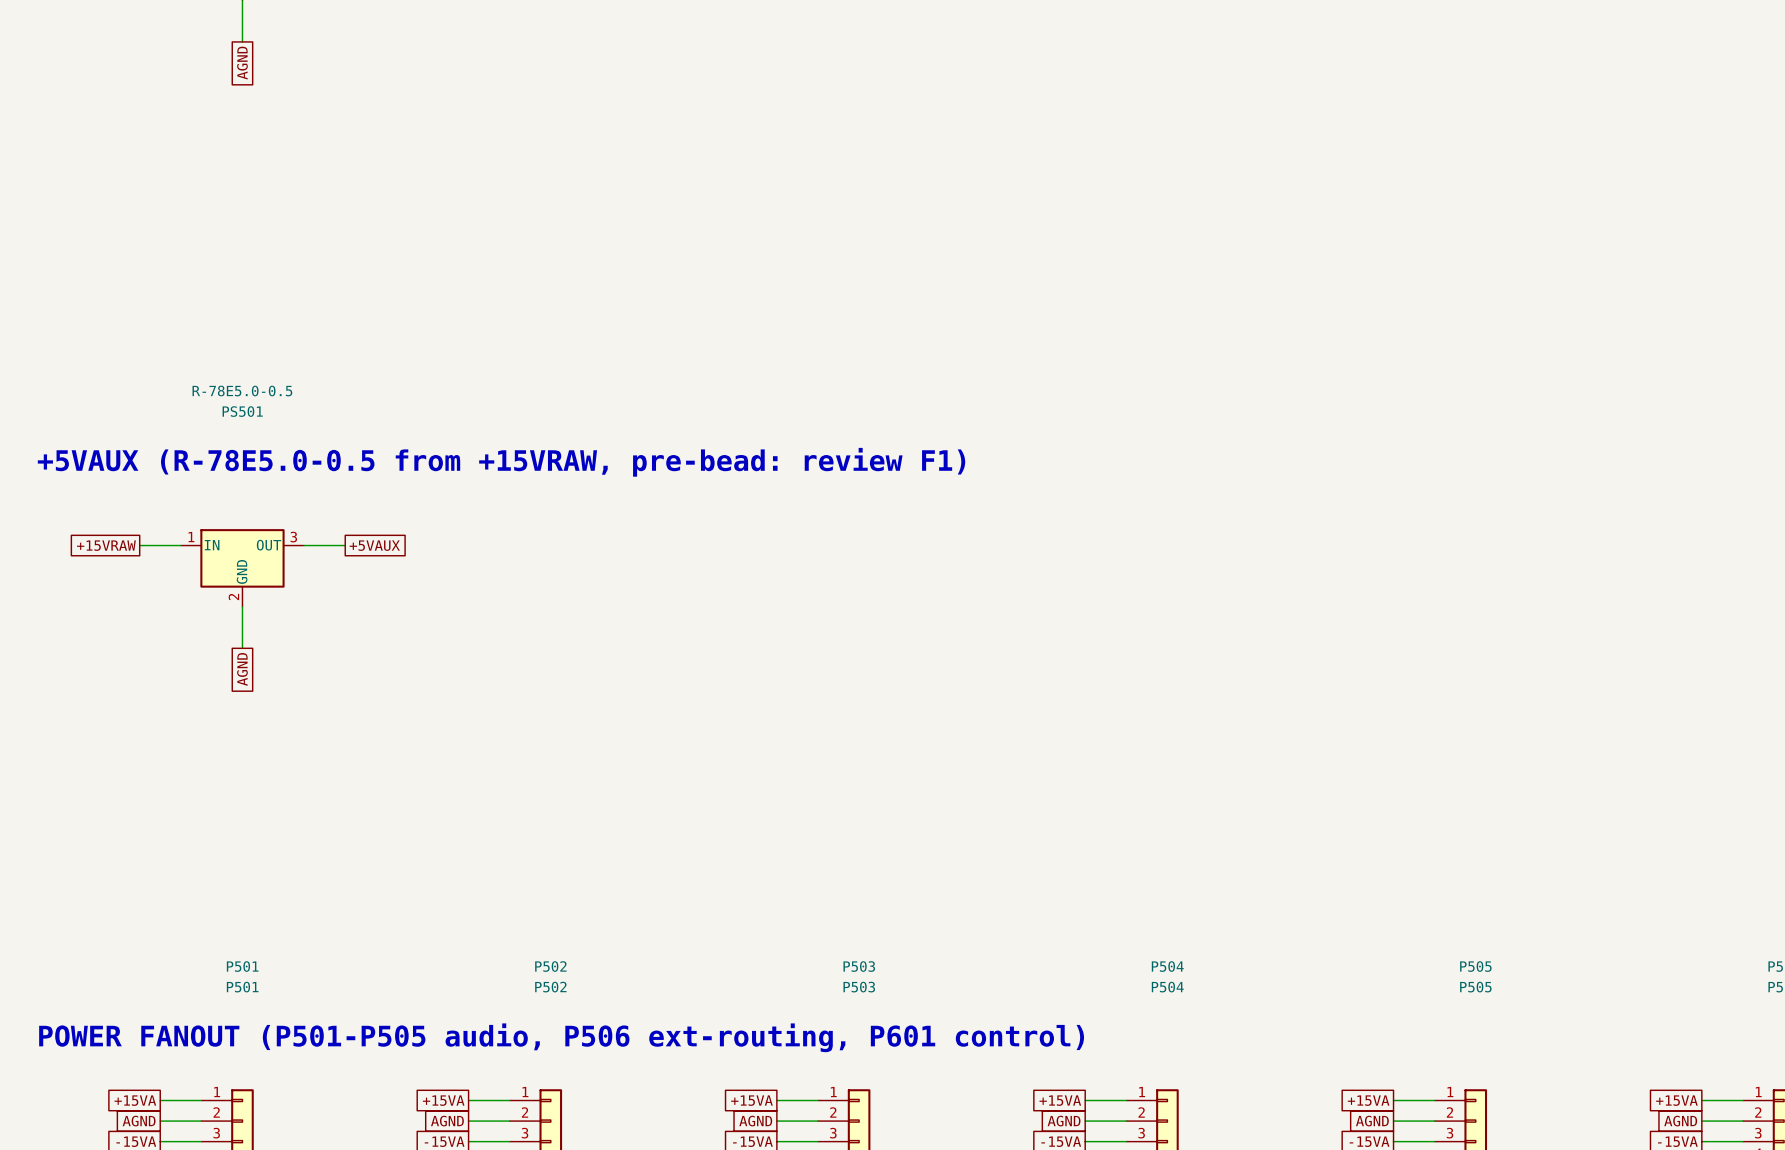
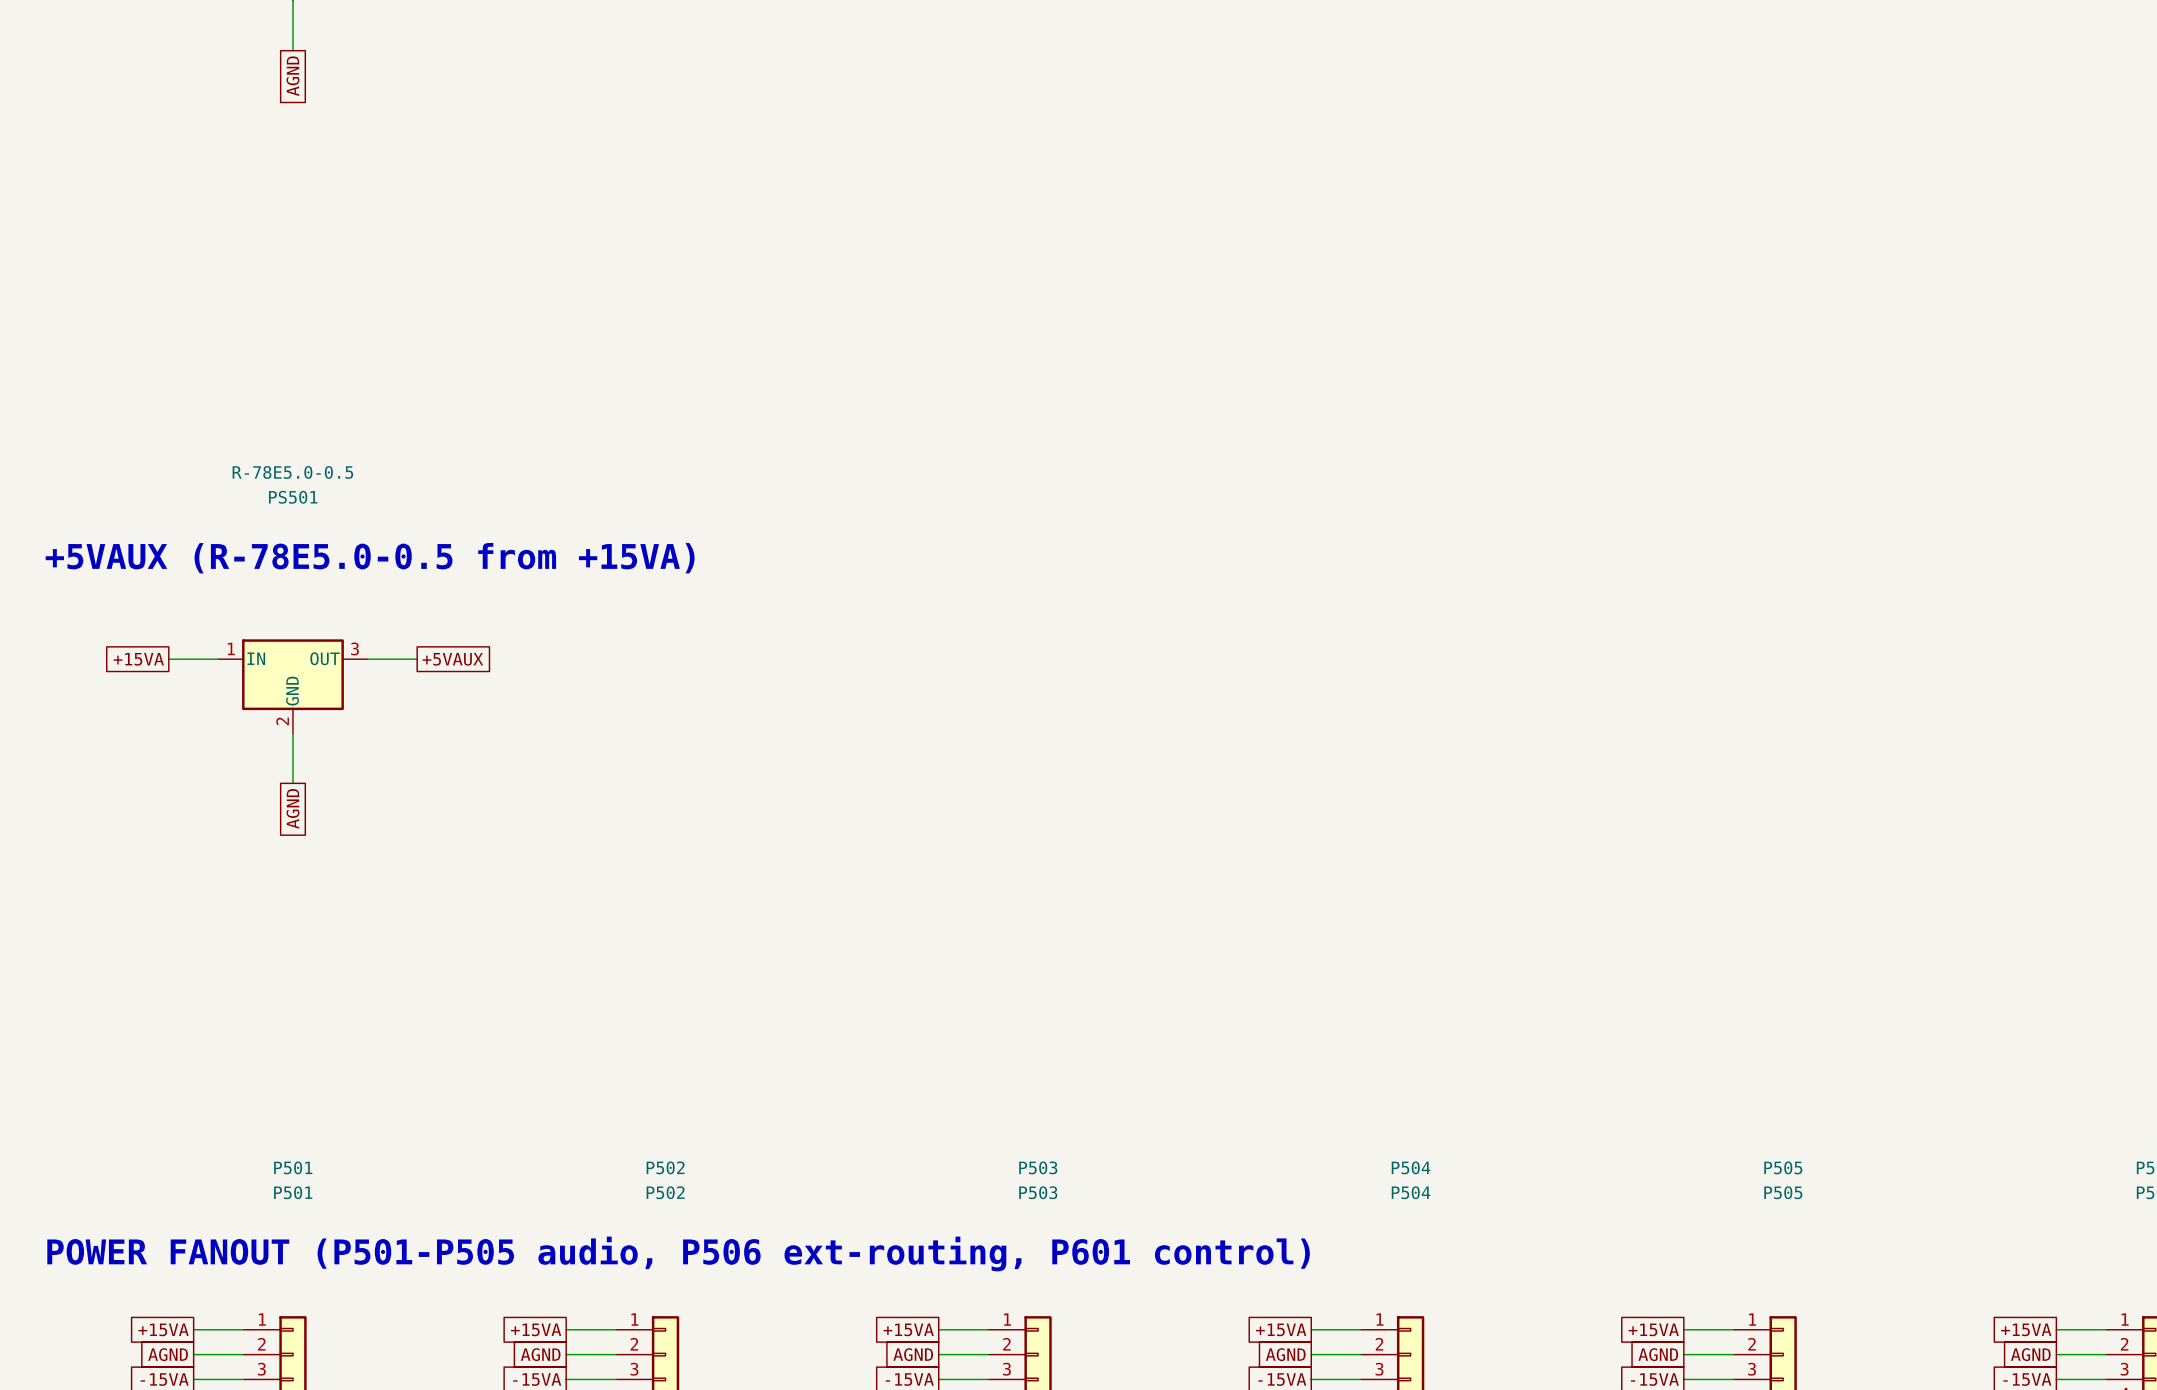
text: +5VAUX (R-78E5.0-0.5 from +15VRAW, pre-bead: review F1) (501, 462) -> +5VAUX (R-78E5.0-0.5 from +15VA) (370, 558)
global label: +15VRAW (106, 545) -> +15VA (138, 659)

